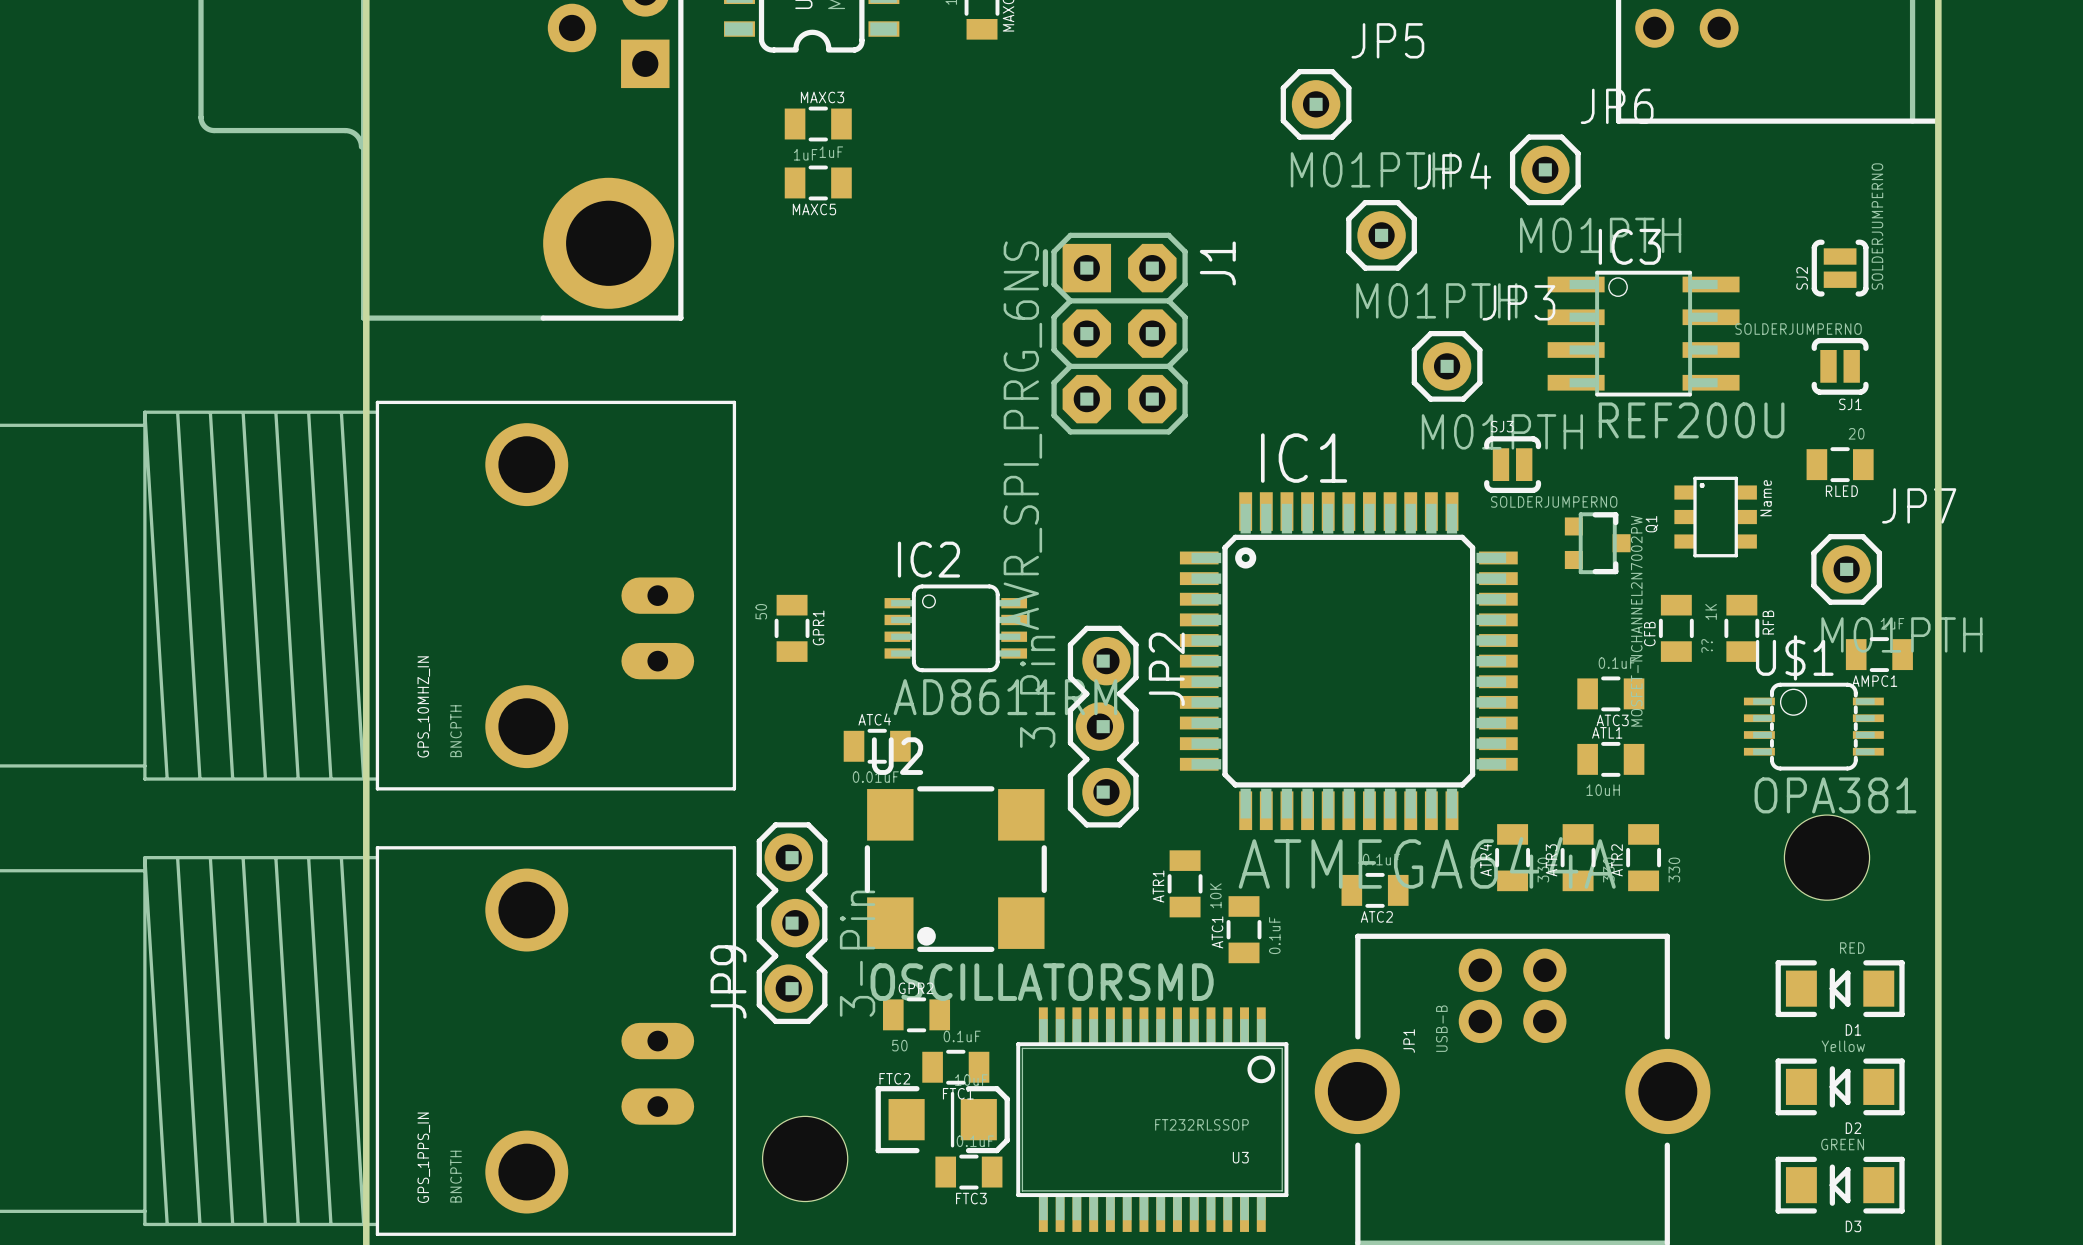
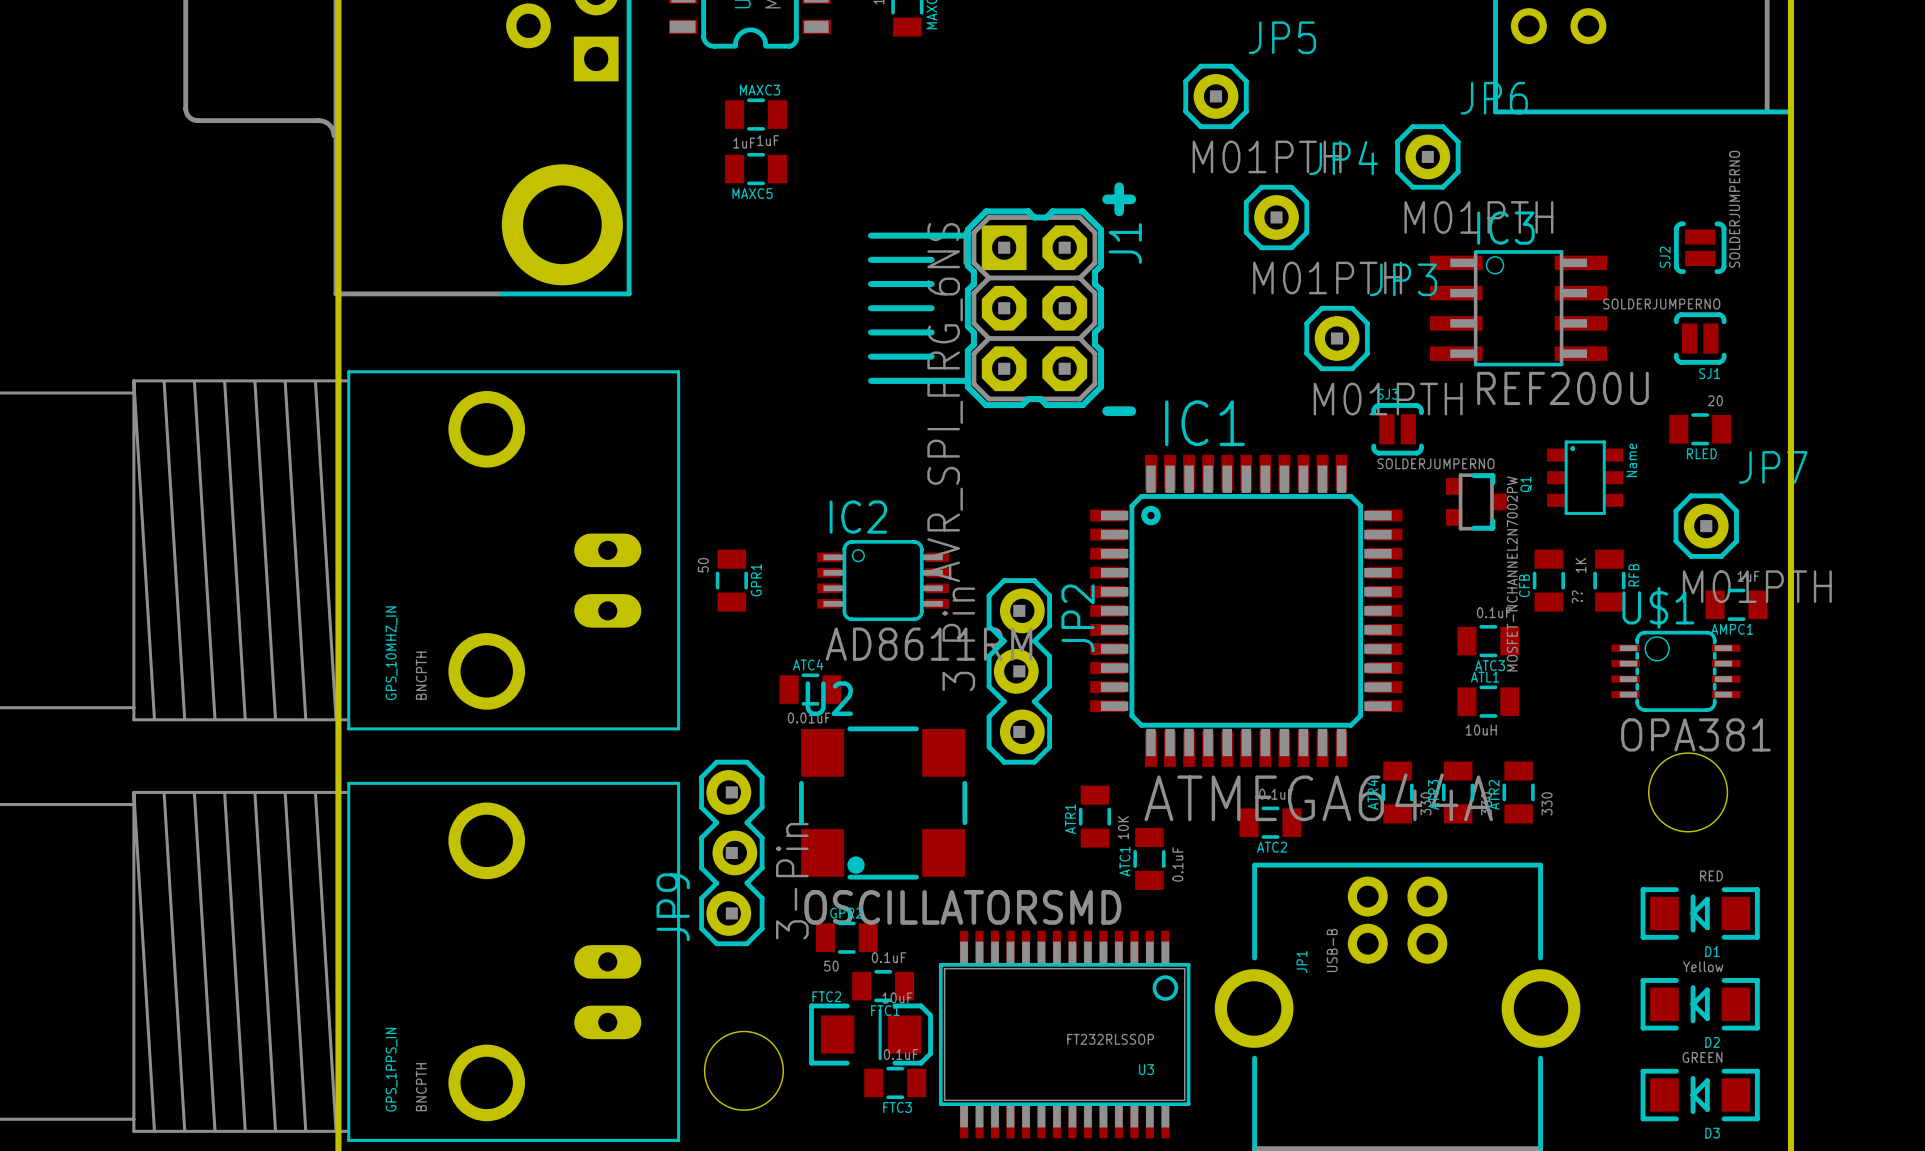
line: none -> (1119, 187) (1119, 211)
line: none -> (1107, 199) (1131, 199)
line: none -> (986, 211) (1028, 211) (1034, 217) (1046, 217) (1052, 211) (1082, 211) (1101, 229) (1101, 265) (1094, 271) (1094, 284) (1101, 290) (1101, 326) (1094, 332) (1094, 344) (1101, 350) (1101, 386) (1082, 405) (1046, 405) (1040, 399) (1028, 399) (1022, 405) (986, 405) (967, 386) (967, 350) (973, 344) (973, 332) (967, 326) (967, 290) (973, 284) (973, 271) (967, 265) (967, 229) (986, 211)
line: none -> (871, 235) (967, 235)
line: none -> (871, 259) (931, 259)
line: none -> (871, 284) (931, 284)
line: none -> (871, 308) (931, 308)
line: none -> (871, 332) (931, 332)
line: none -> (871, 356) (931, 356)
line: none -> (871, 380) (967, 380)
line: none -> (1107, 411) (1131, 411)

